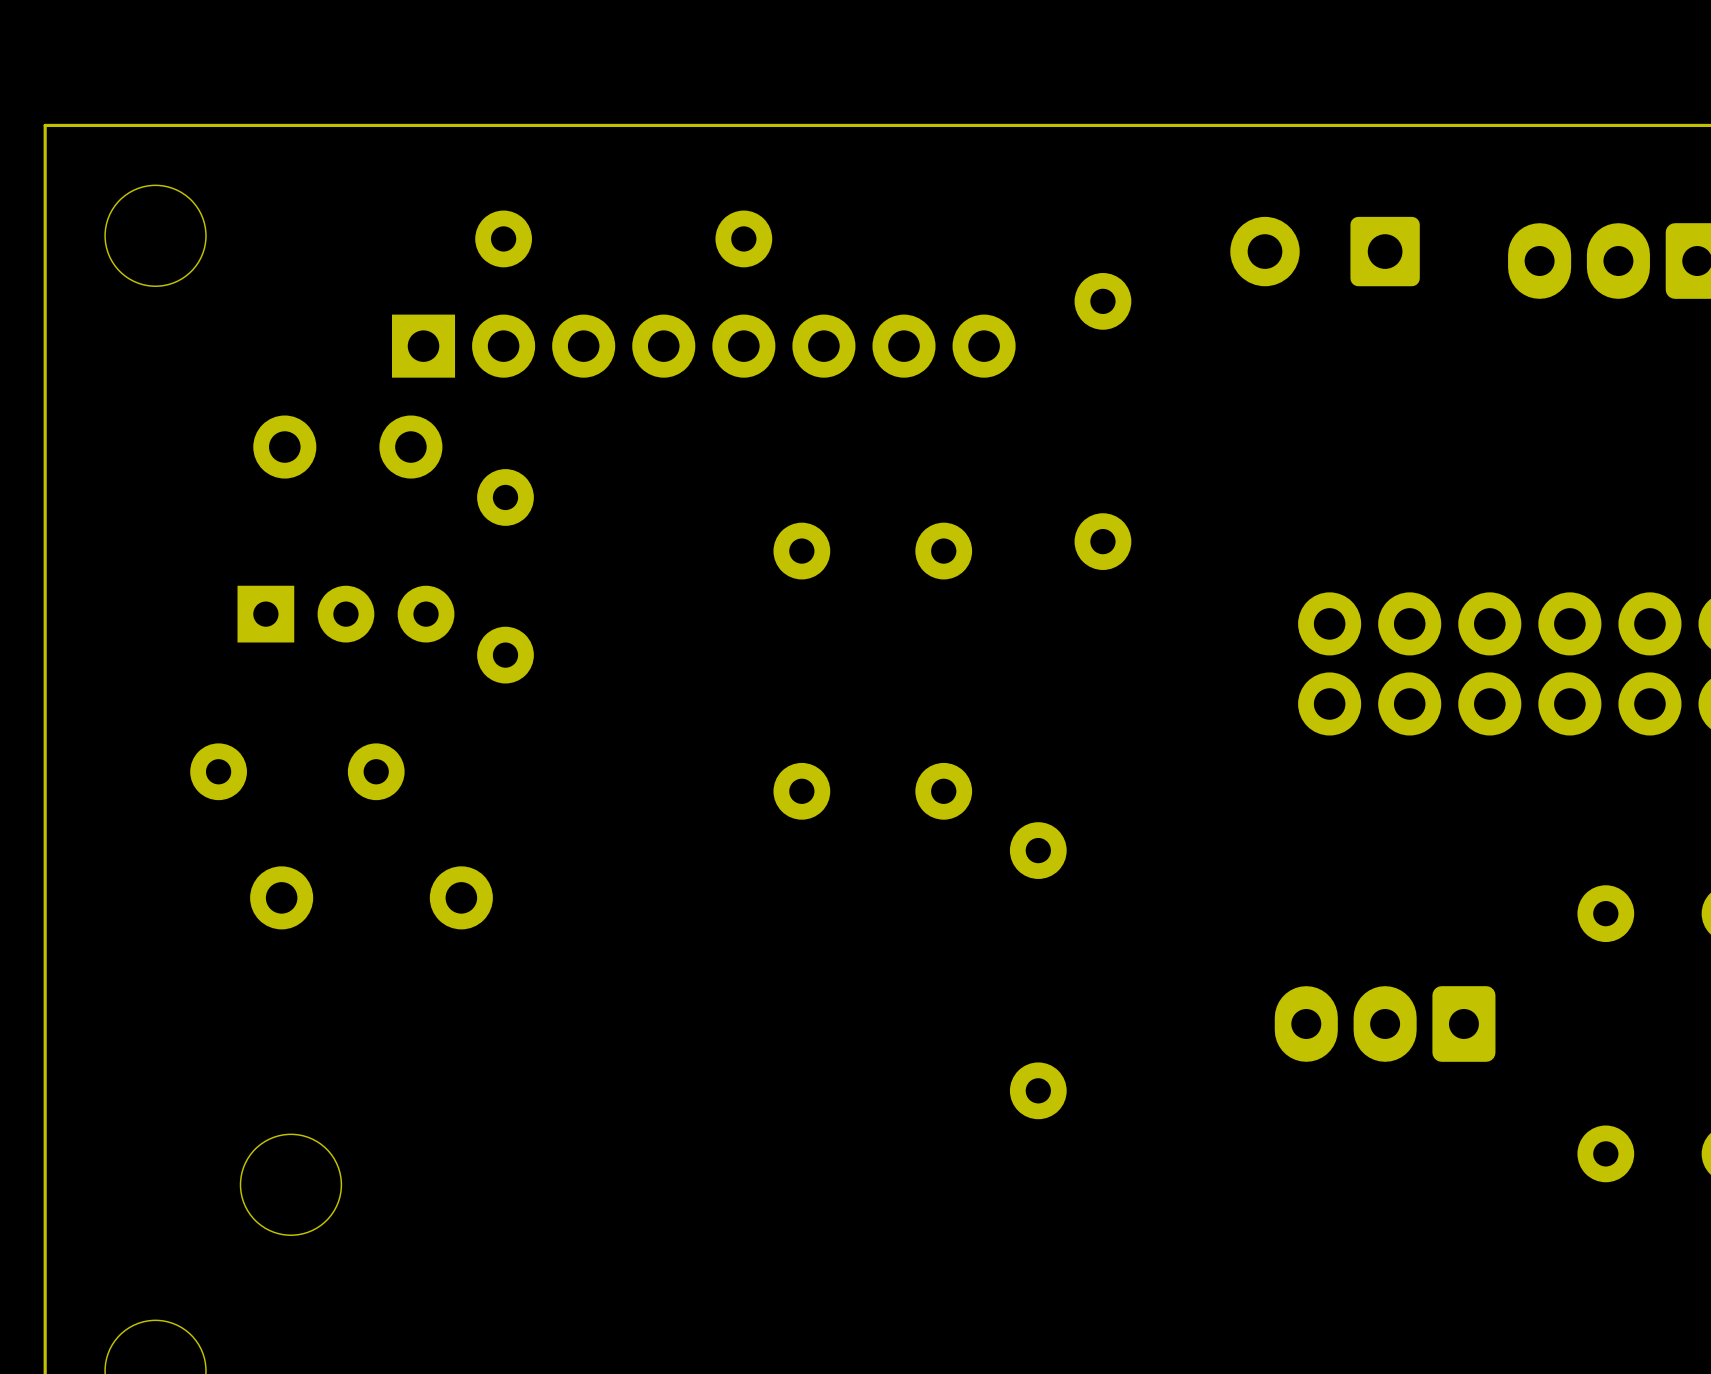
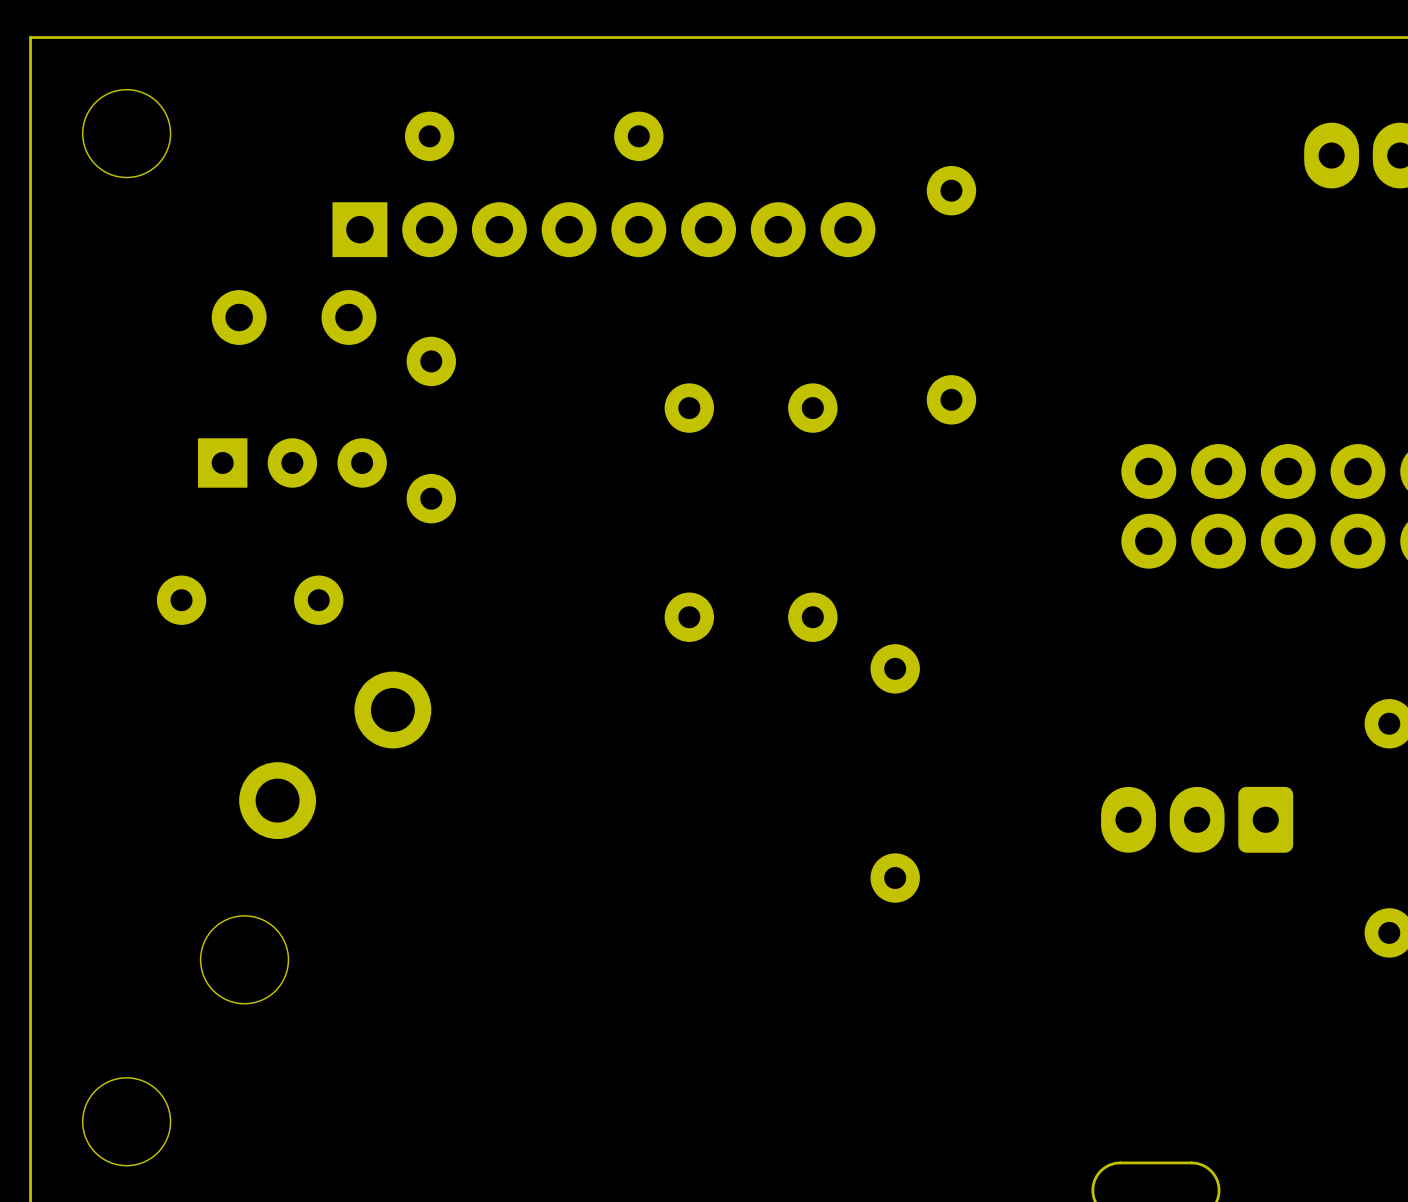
part: (1325, 251) -> none
part footprint: [429, 866, 493, 930] -> [354, 671, 432, 749]
part: (281, 897) -> none
part: none -> (277, 800)

